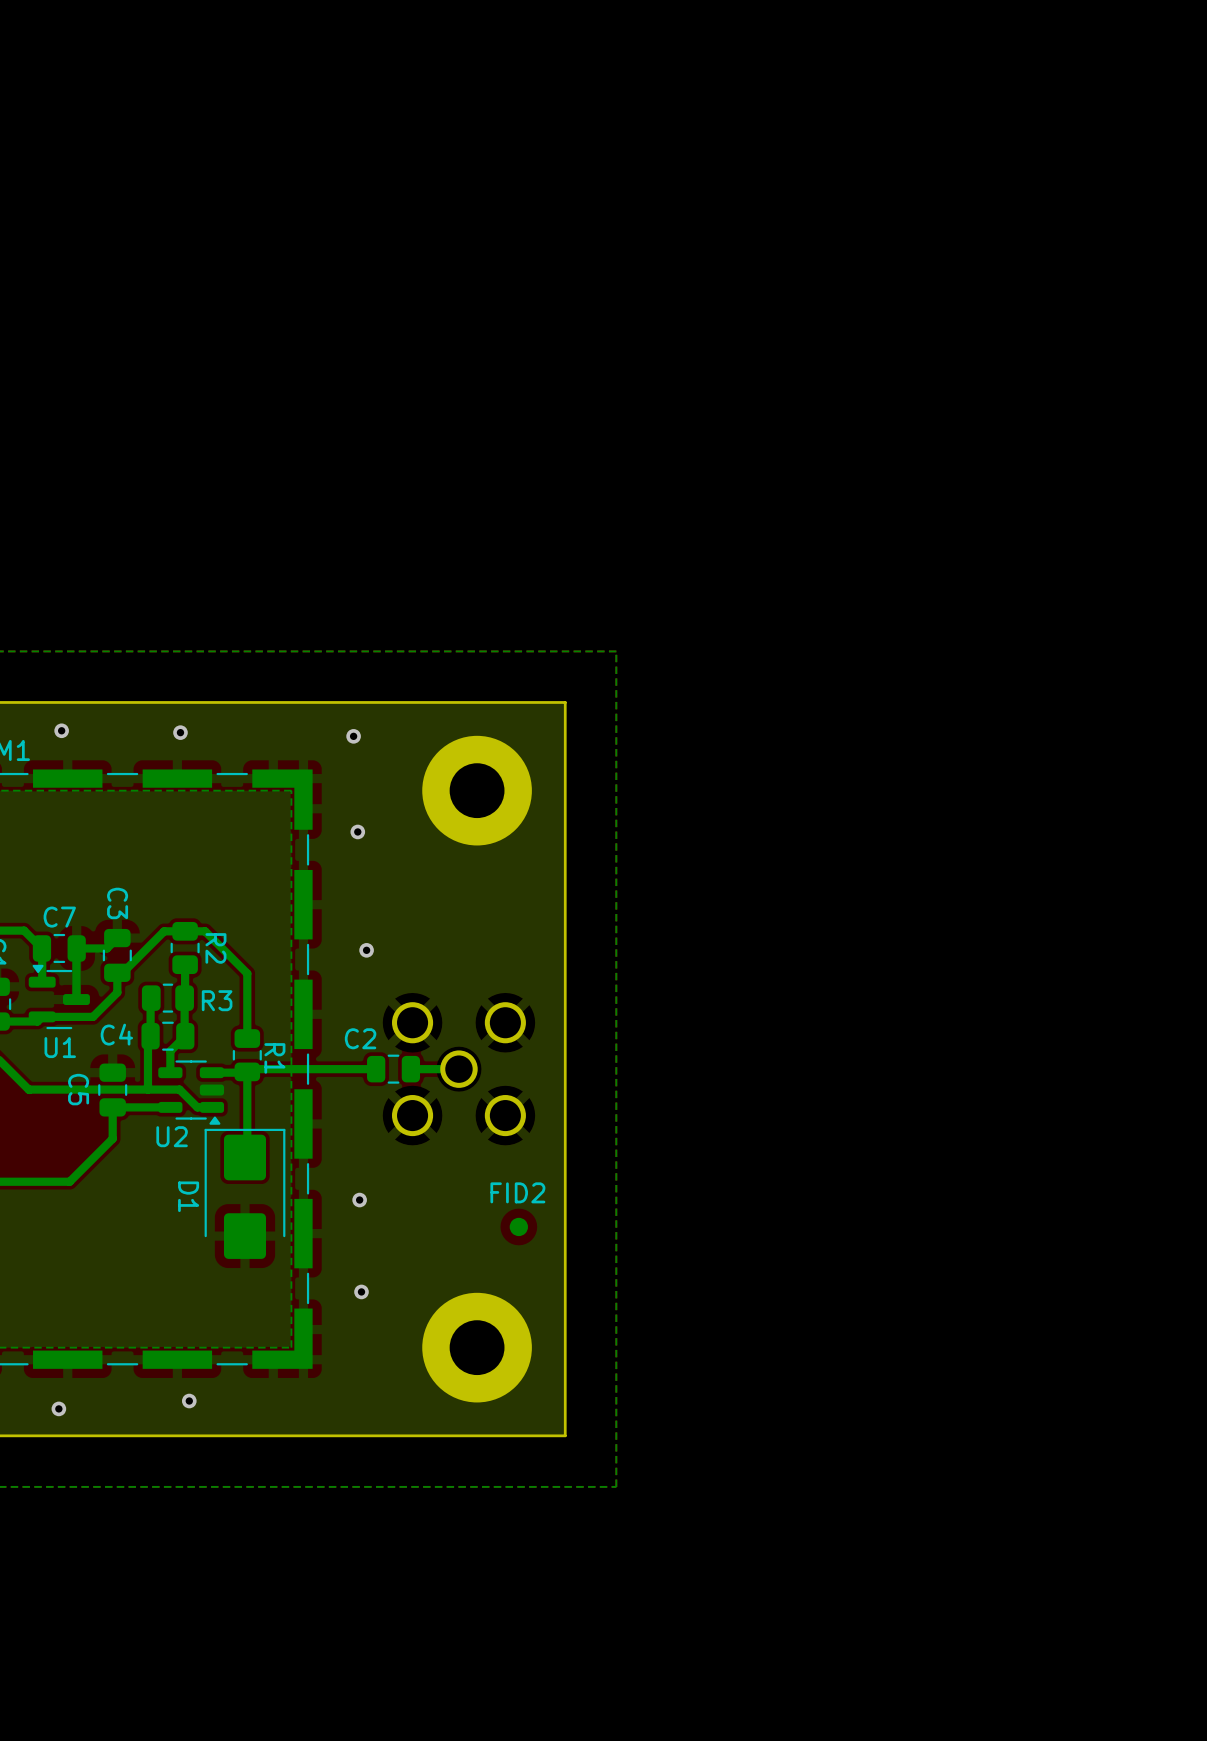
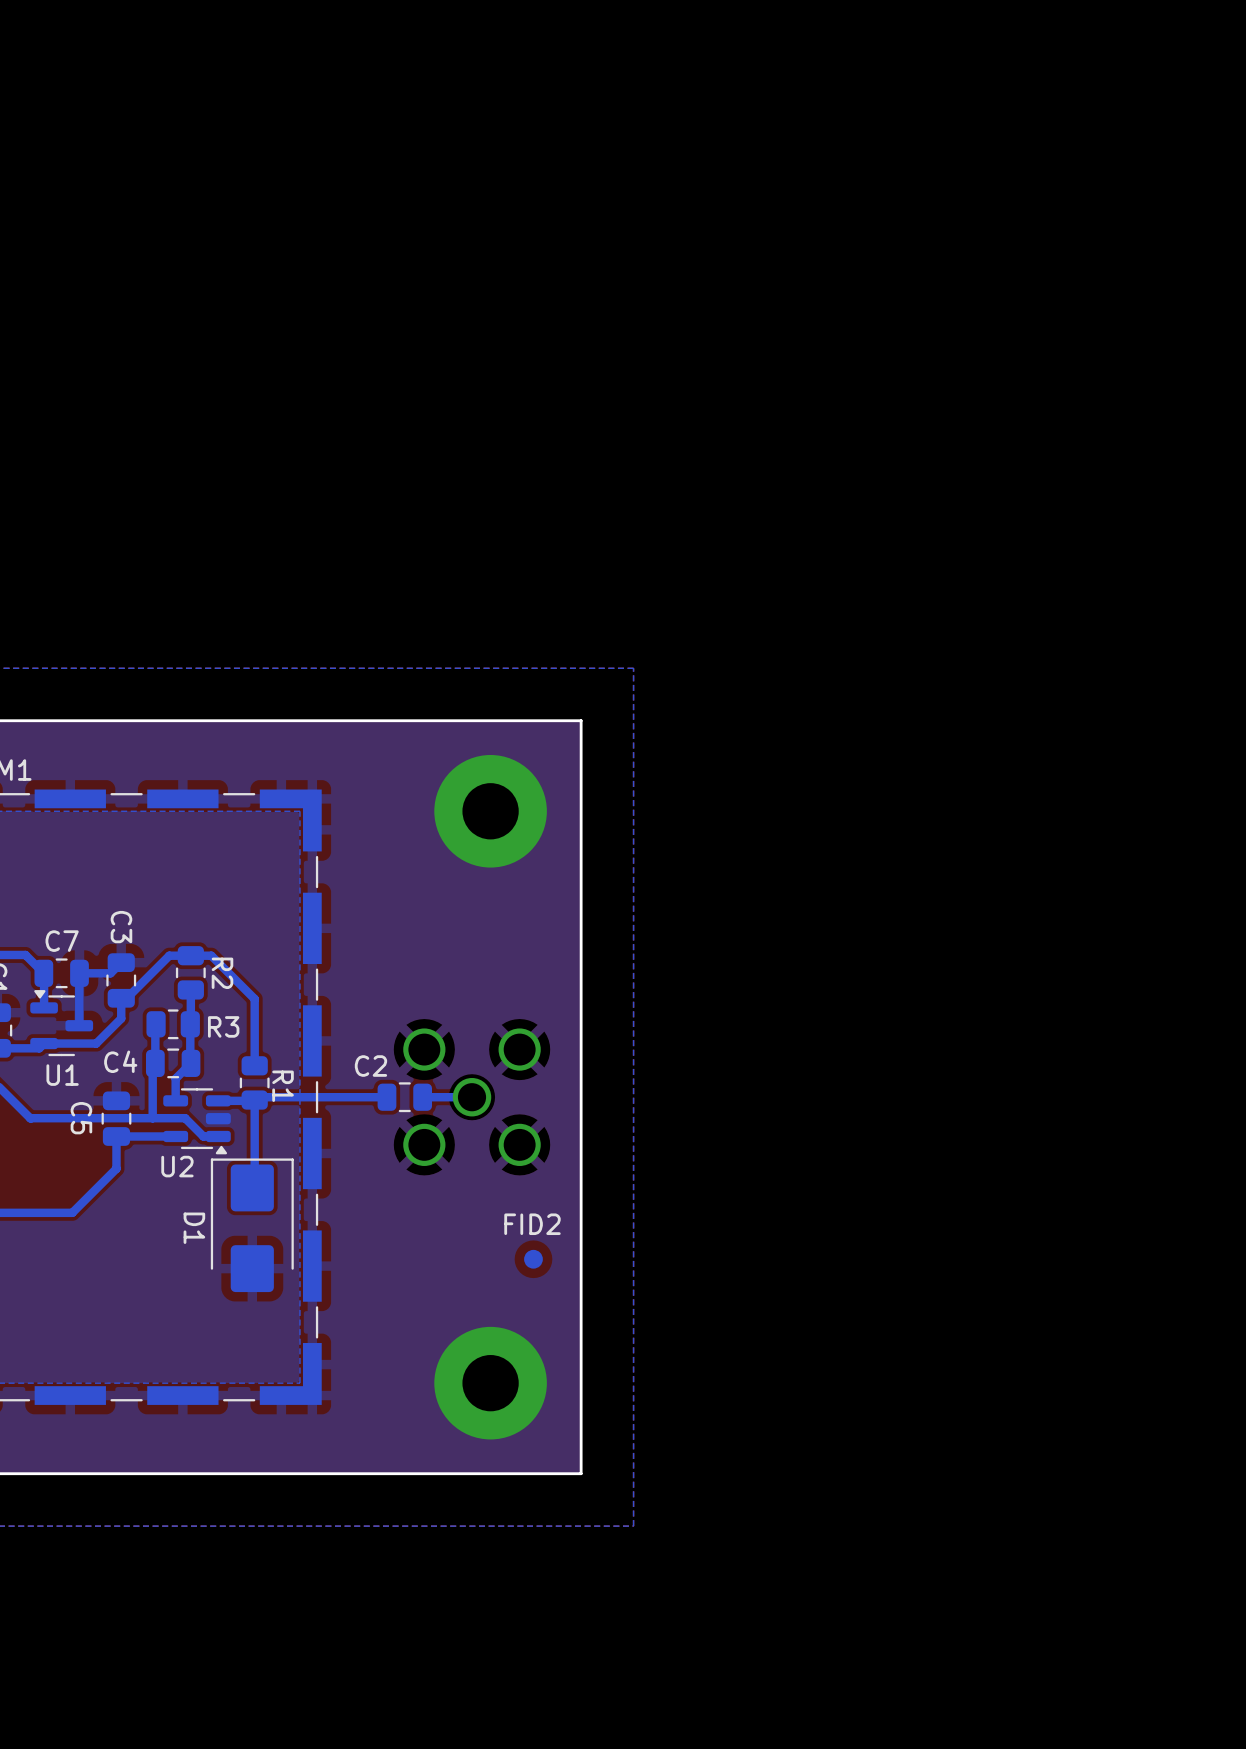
via: (61, 730) -> none
via: (180, 732) -> none
via: (353, 736) -> none
via: (357, 831) -> none
via: (366, 950) -> none
via: (359, 1200) -> none
via: (361, 1291) -> none
via: (189, 1401) -> none
via: (58, 1408) -> none

